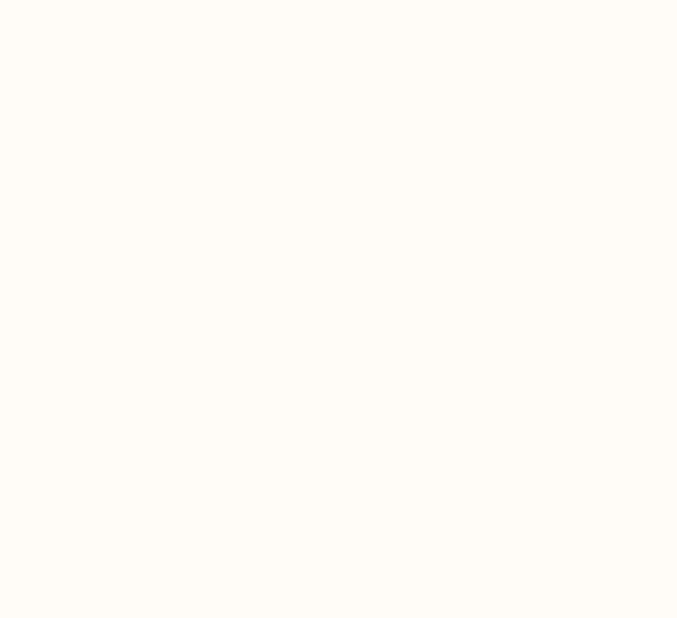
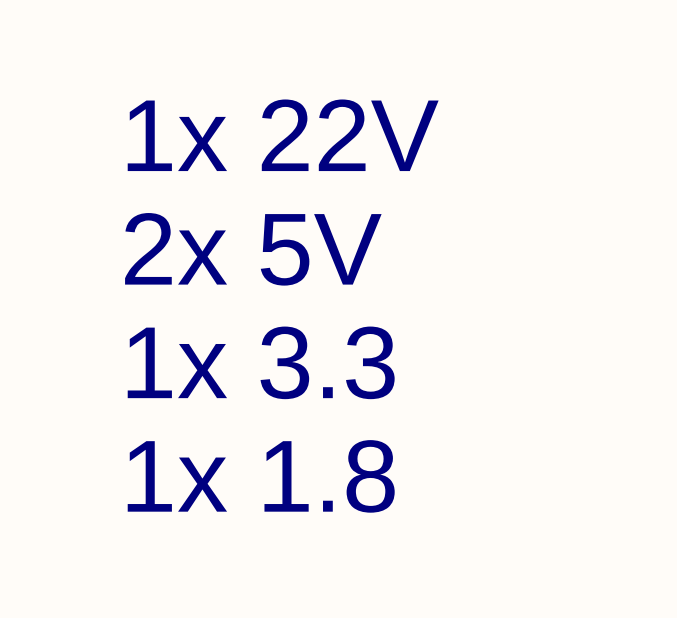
text: none -> 1x 22V (283, 135)
text: none -> 2x 5V (253, 249)
text: none -> 1x 3.3 (261, 362)
text: none -> 1x 1.8 (261, 476)

